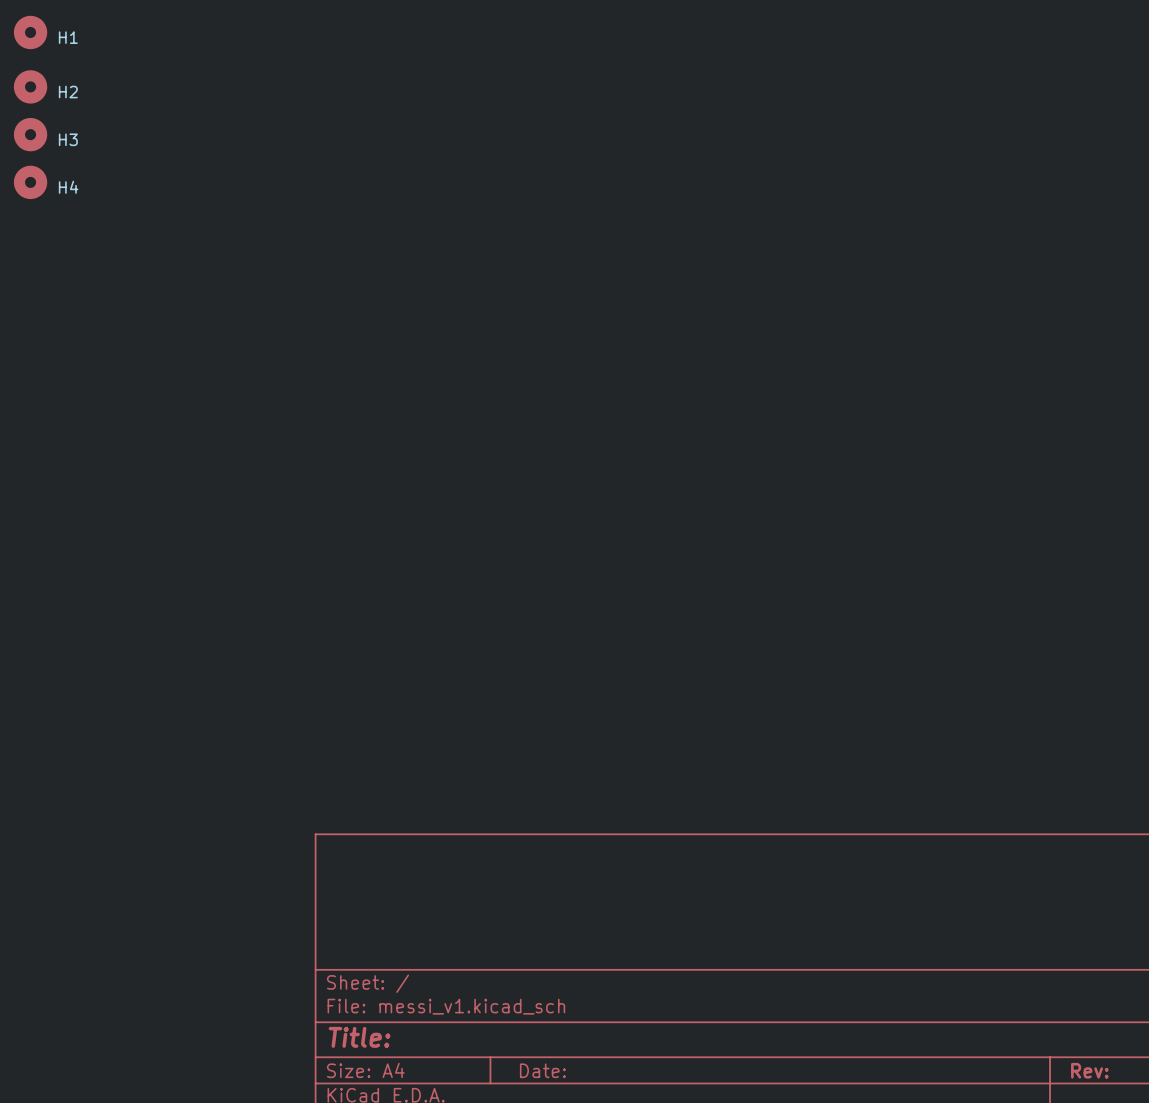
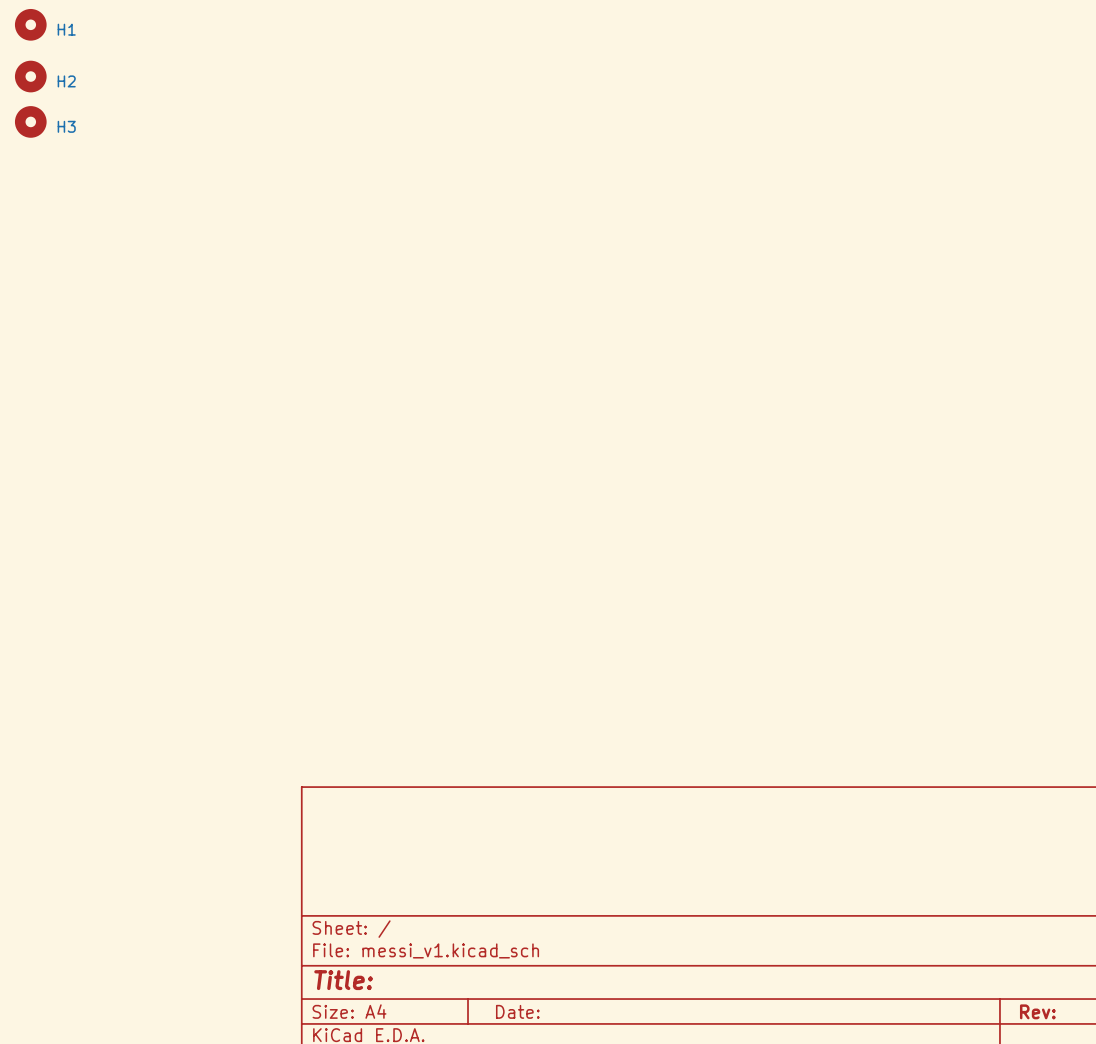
H4: (30, 182) -> none

